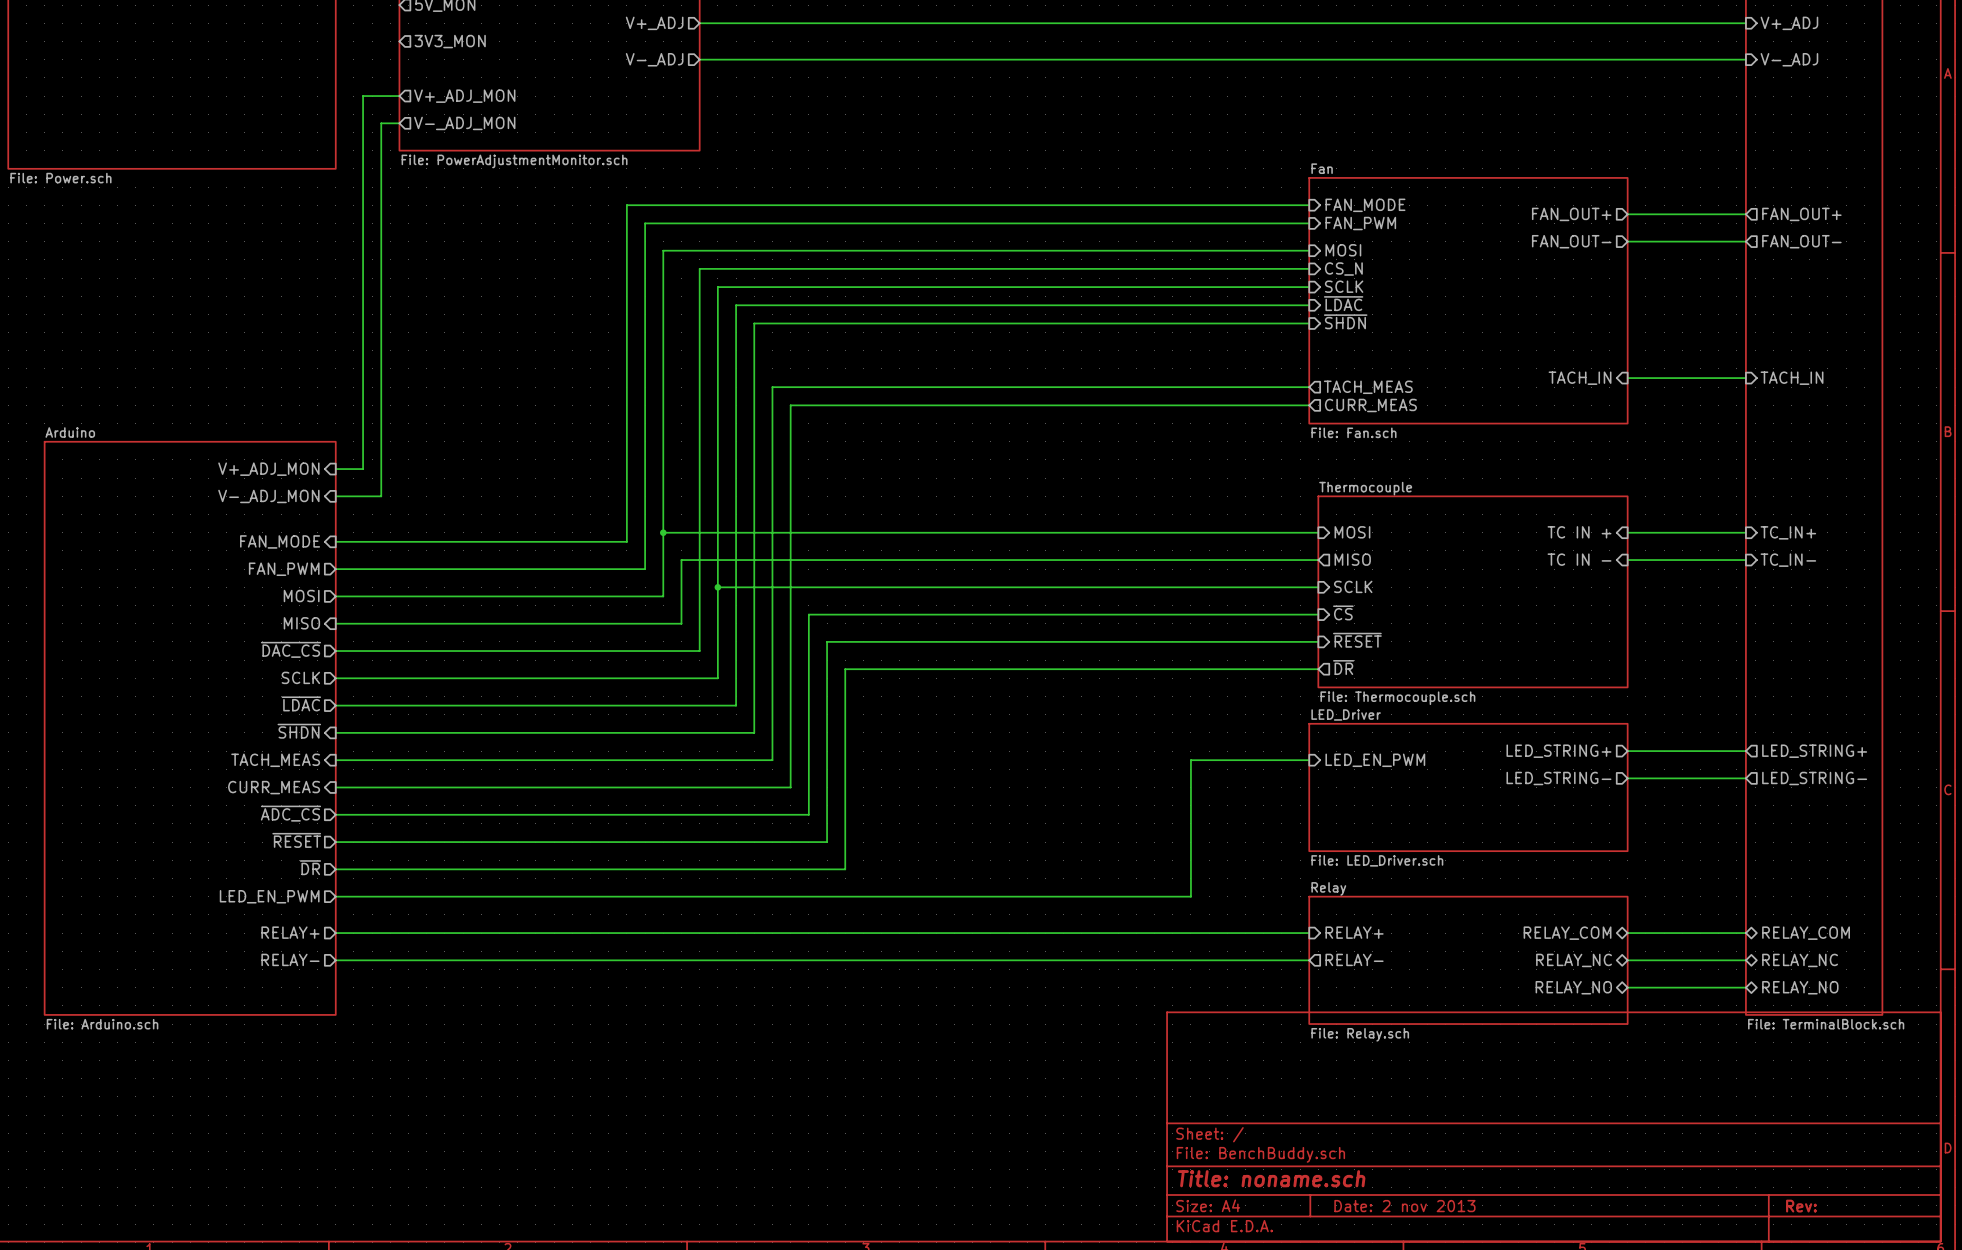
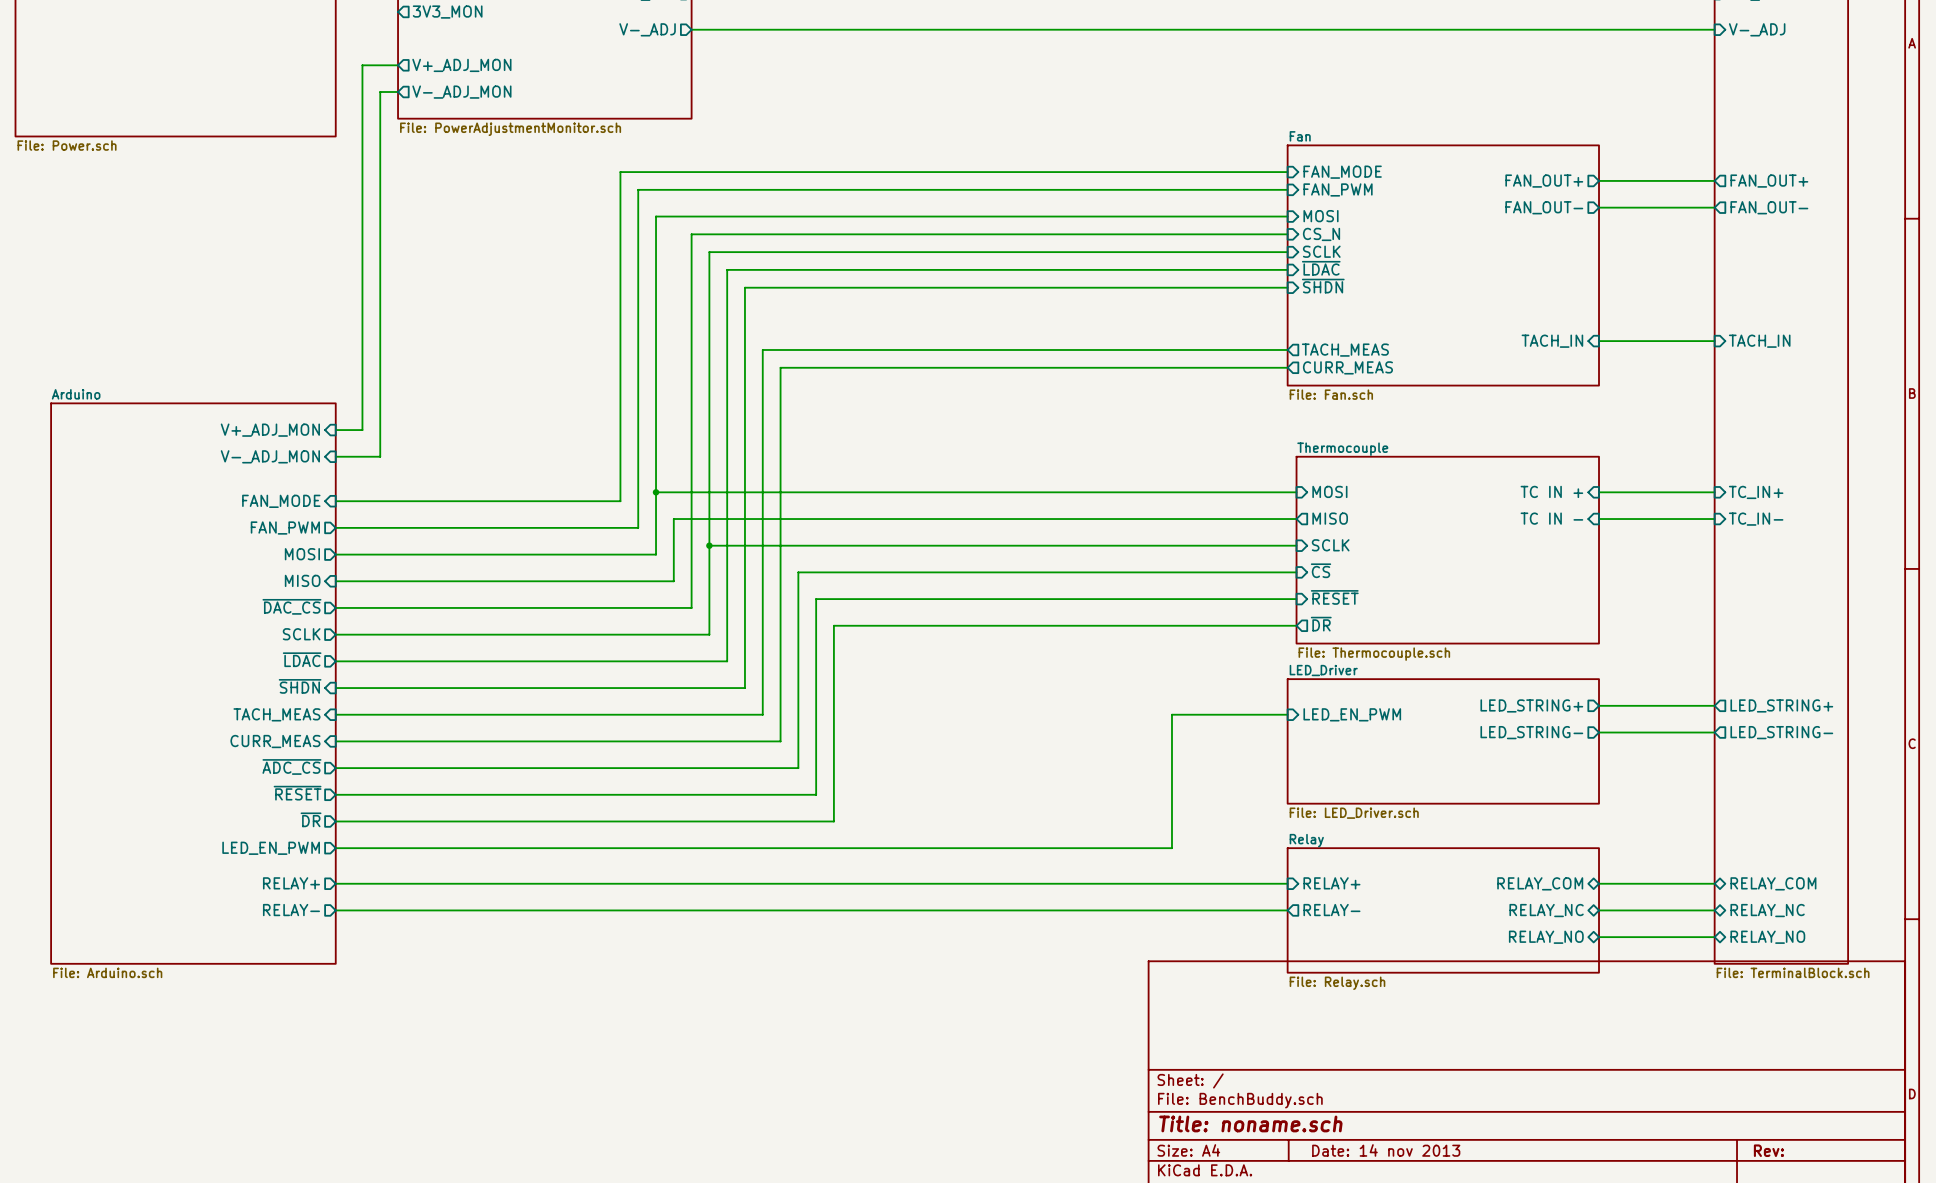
title block: Date: 2 nov 2013 (1404, 1206) -> Date: 14 nov 2013 (1386, 1150)

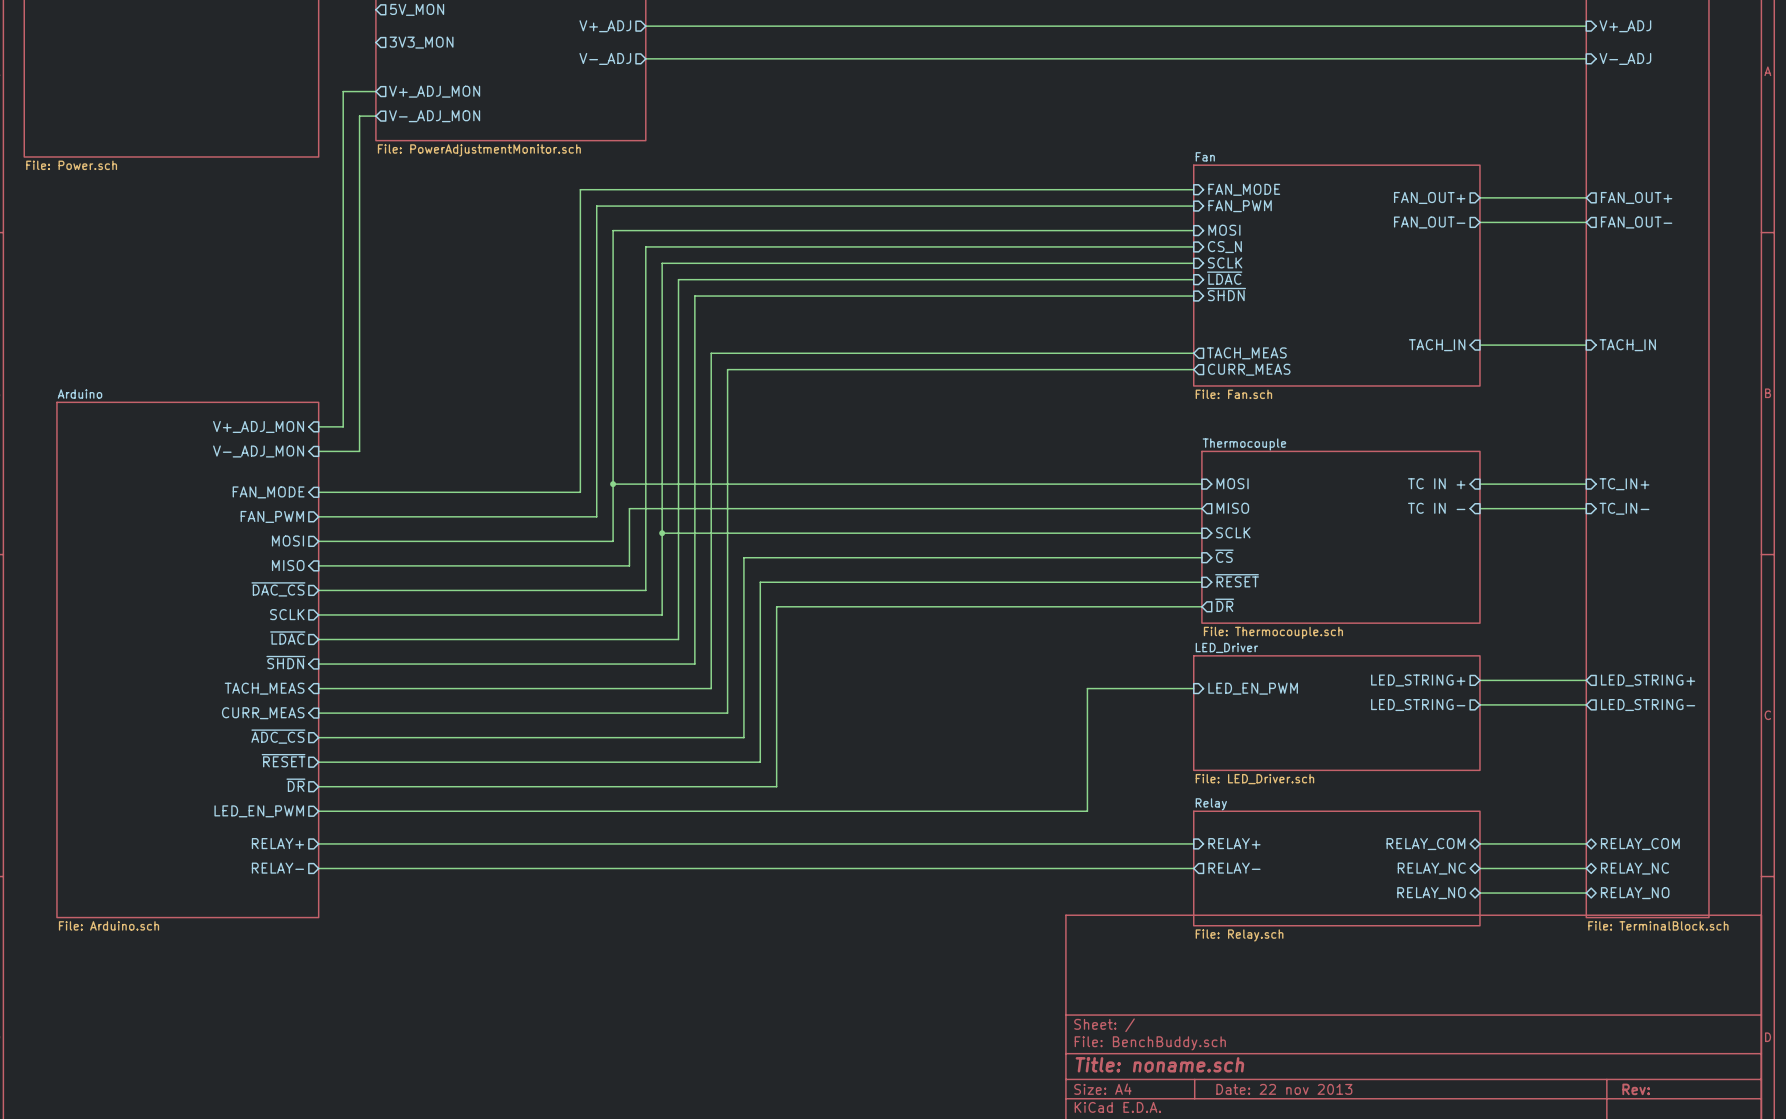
title block: Date: 14 nov 2013 (1386, 1150) -> Date: 22 nov 2013 (1284, 1089)

